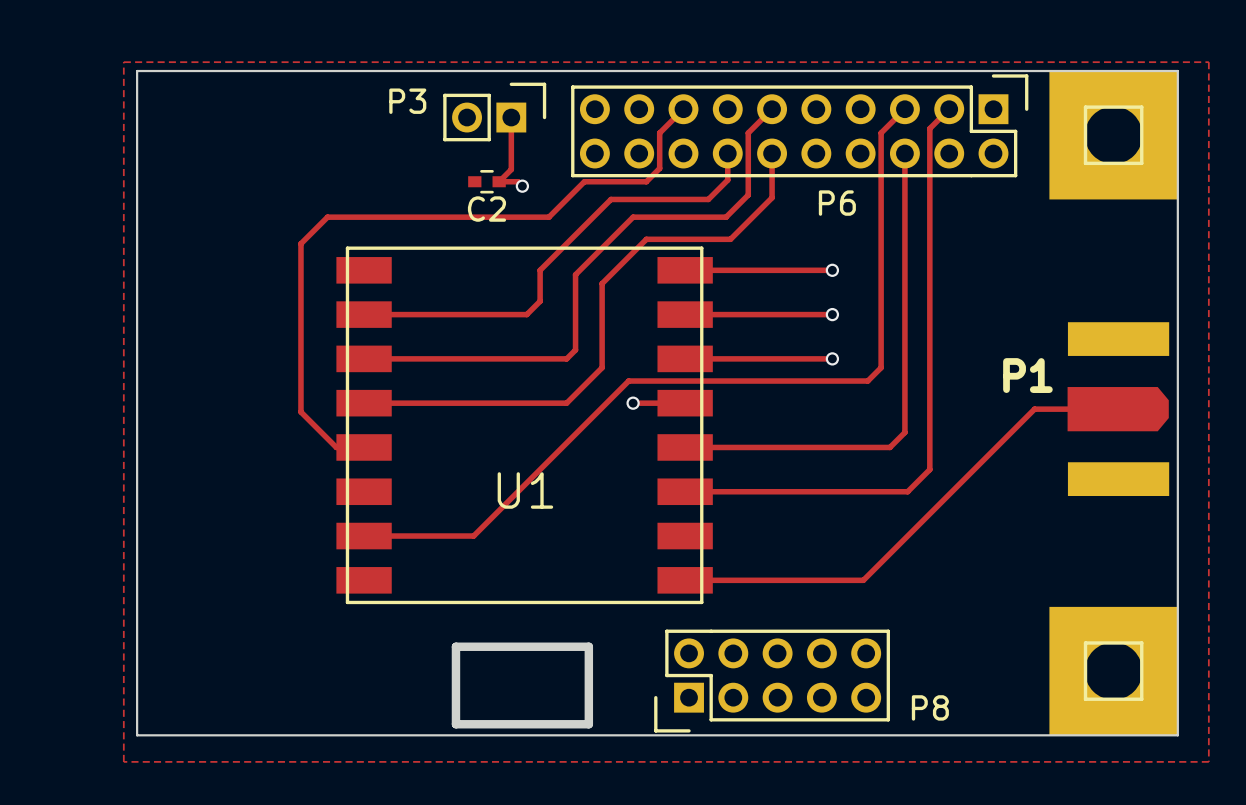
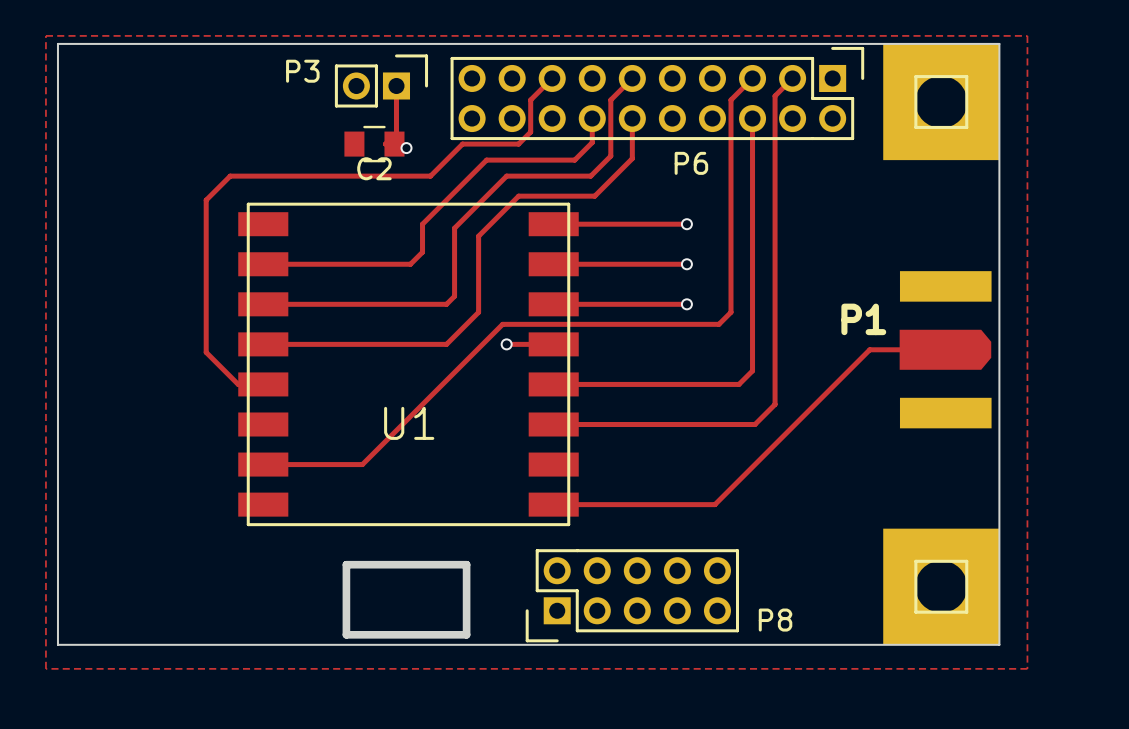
C2 footprint: [468, 170, 506, 194] -> [344, 125, 405, 163]

